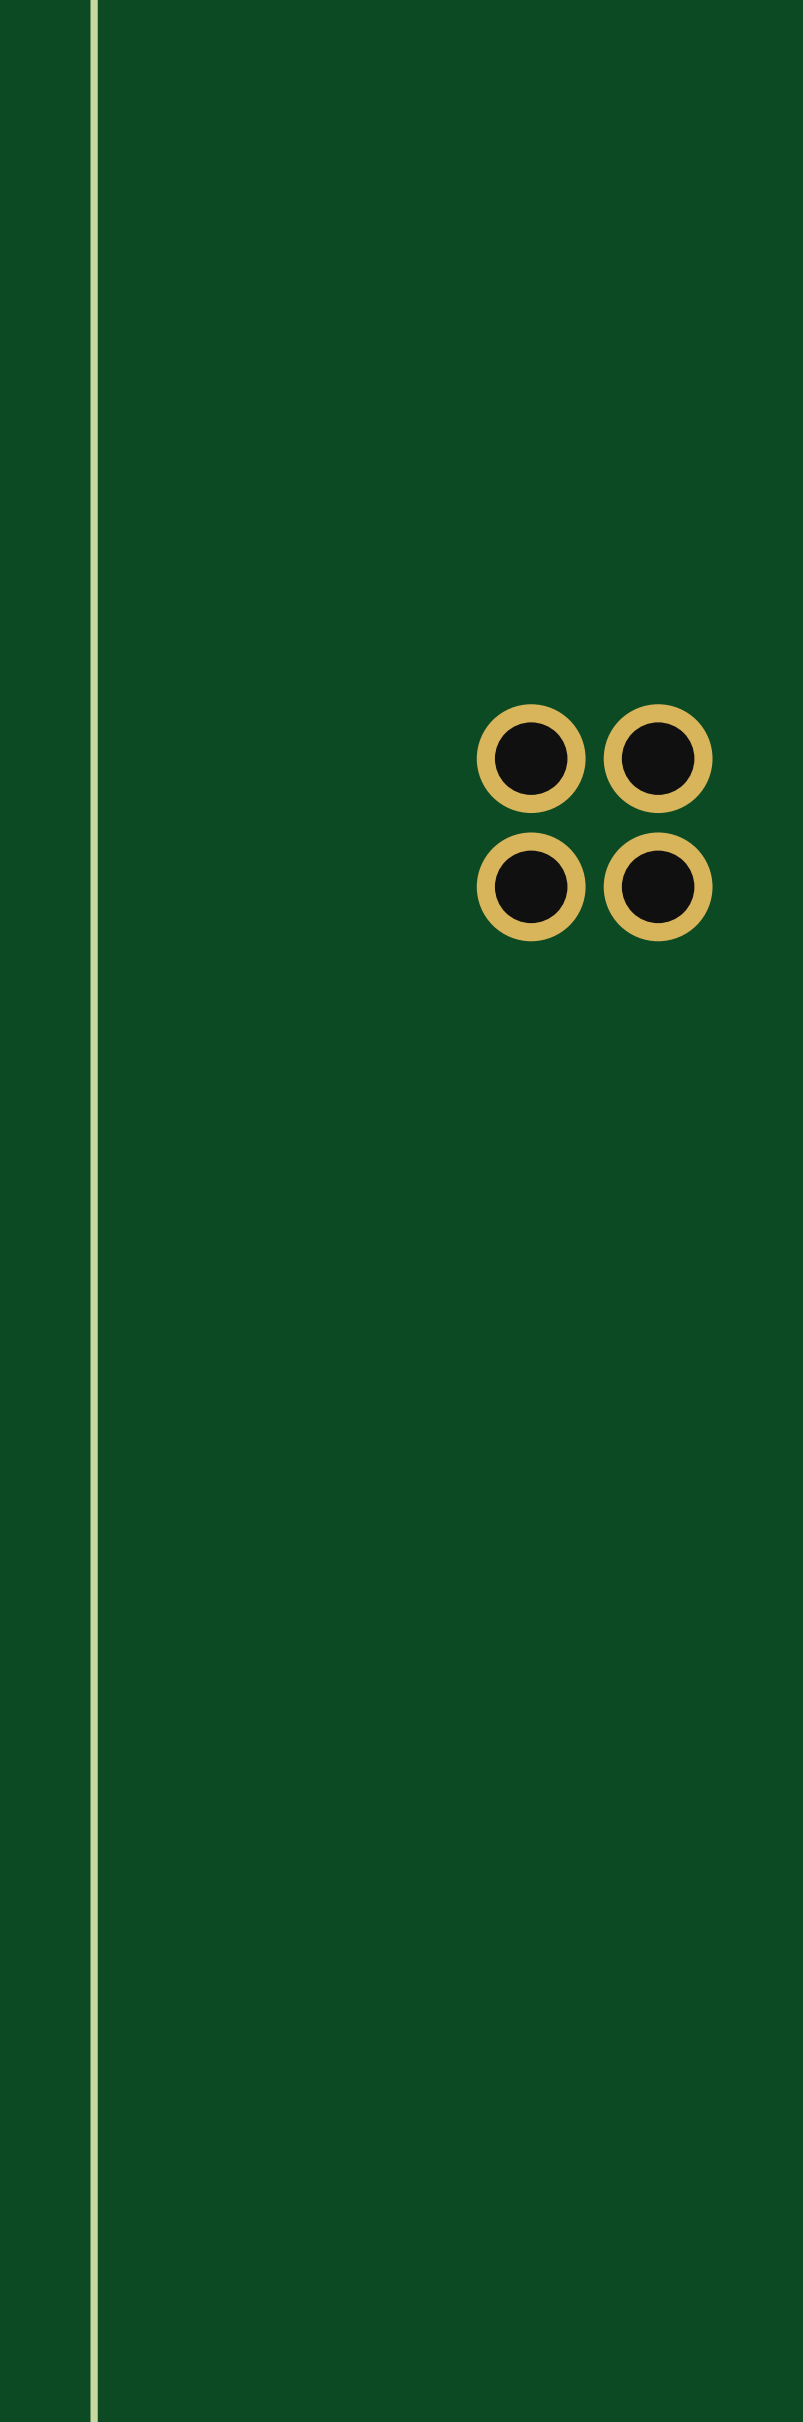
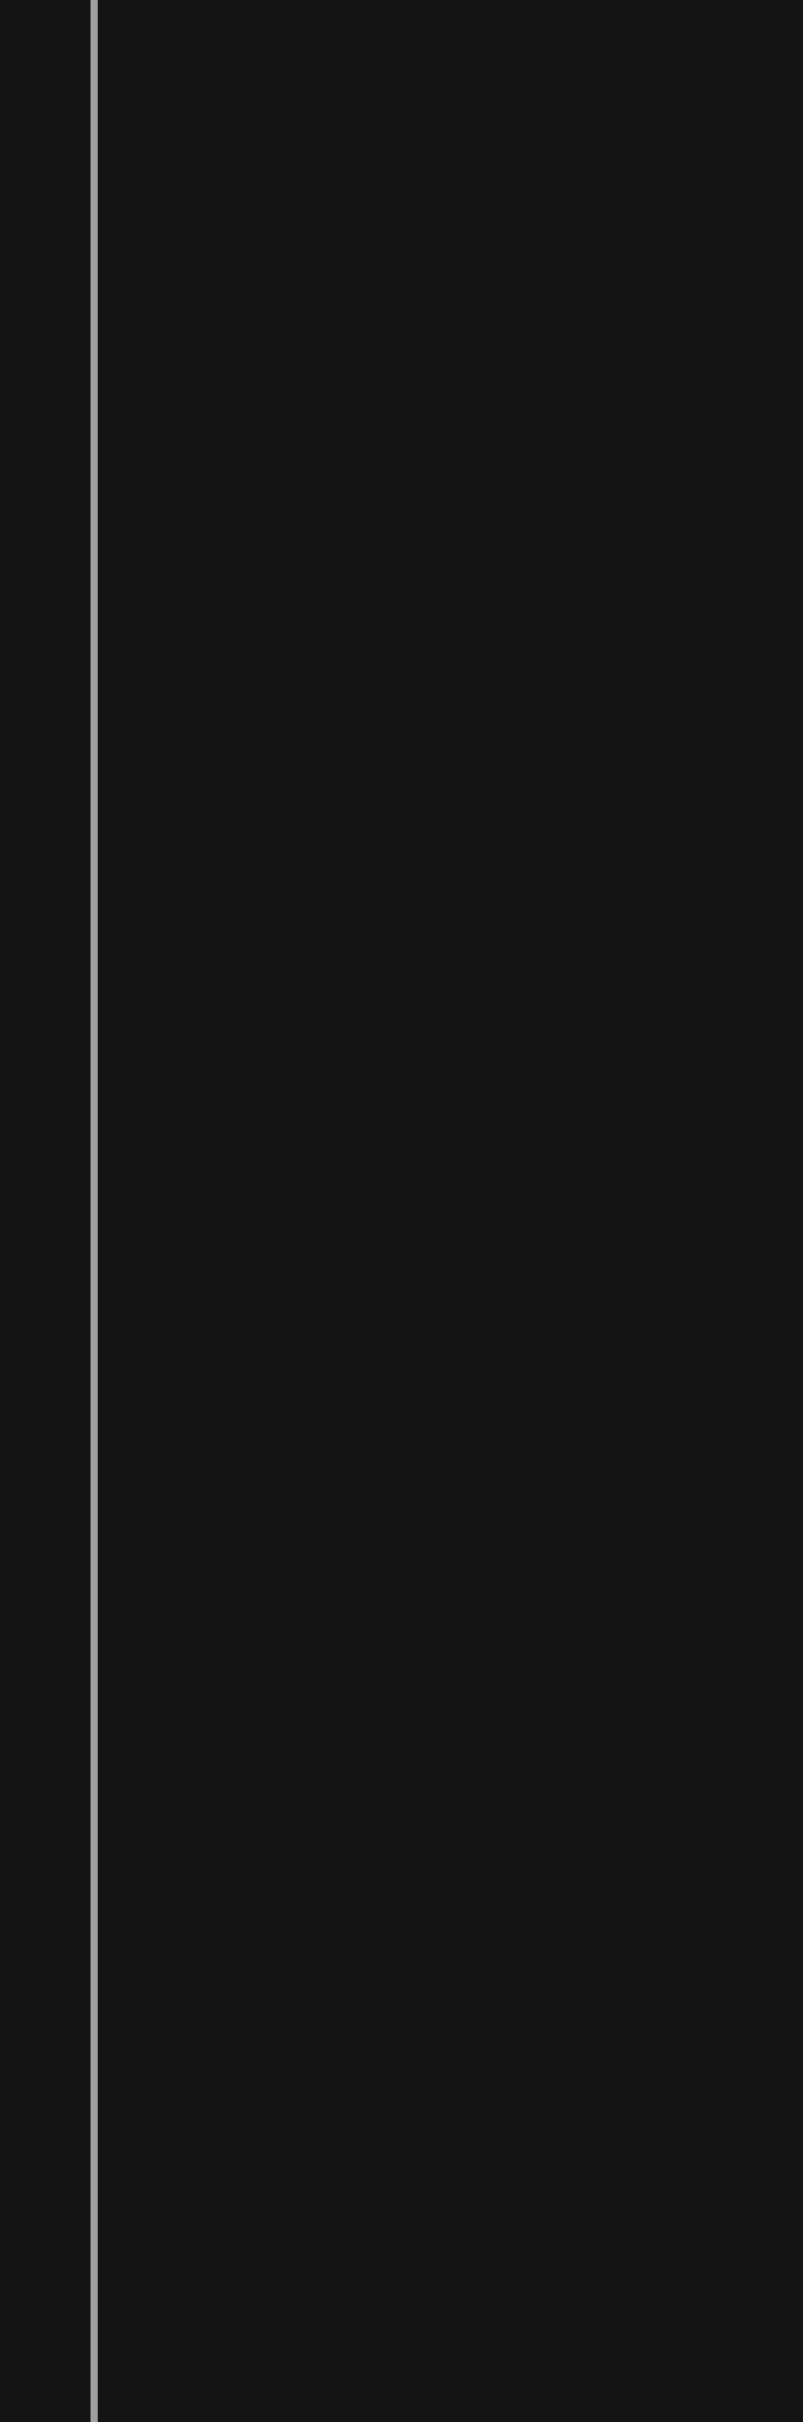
part: (594, 822) -> none

